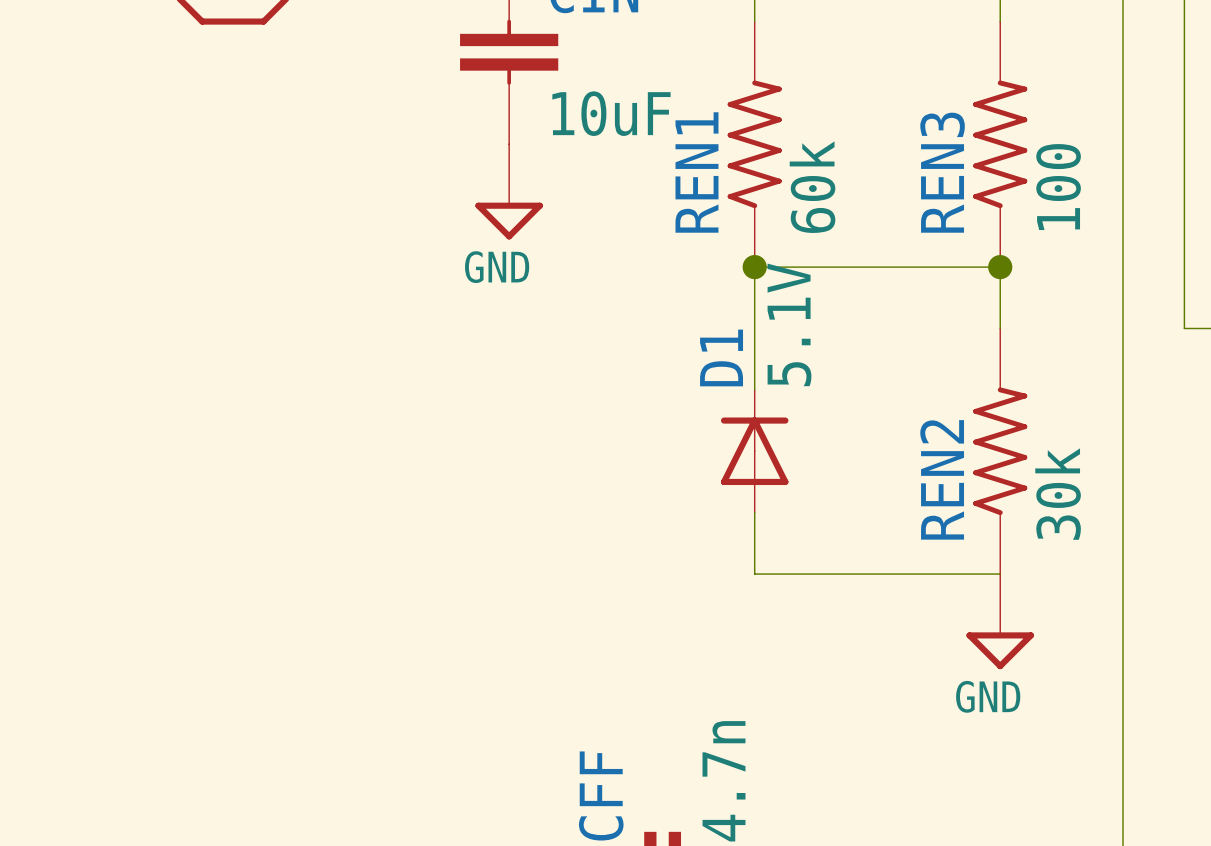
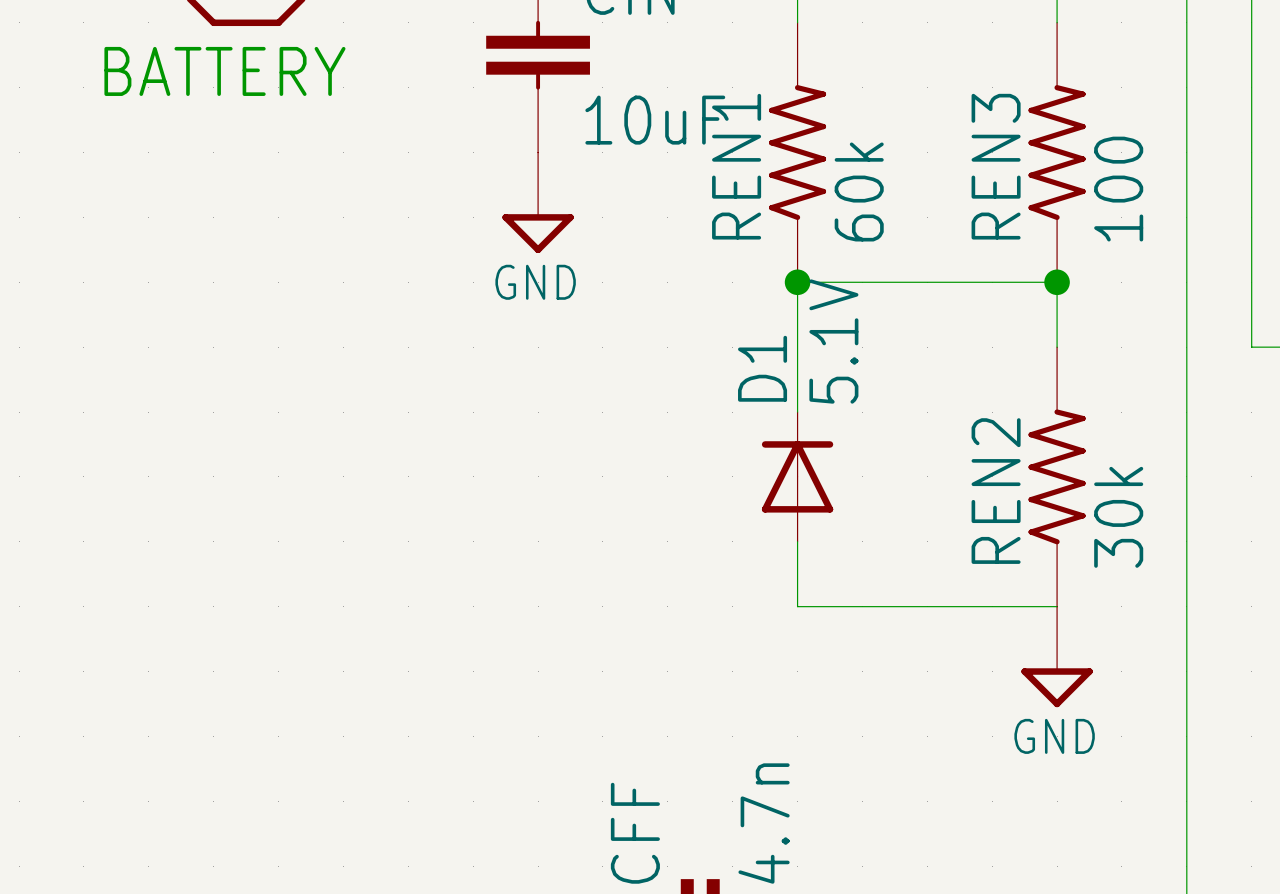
text: none -> BATTERY (224, 71)

